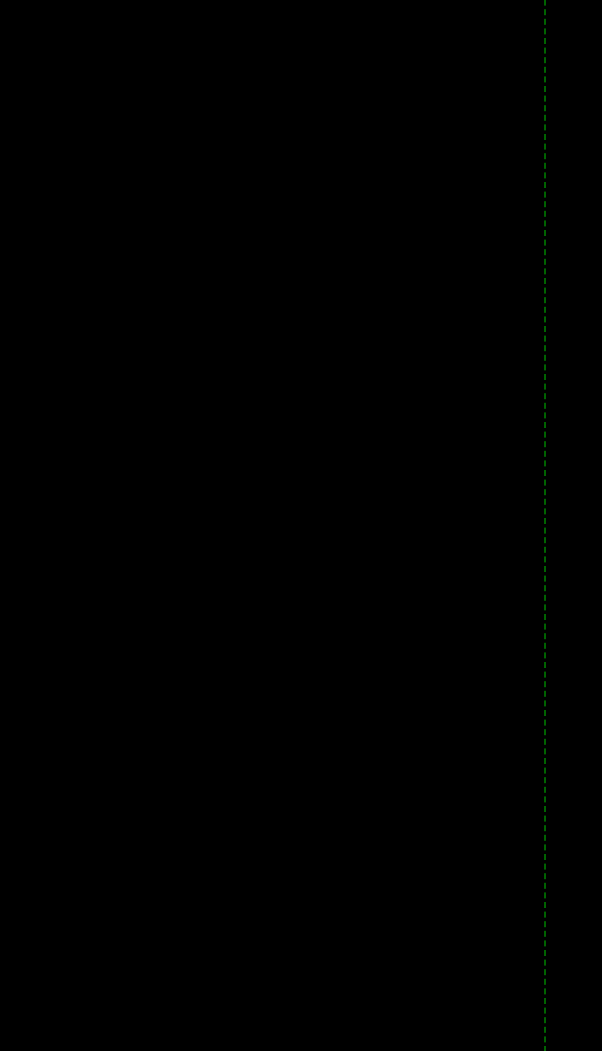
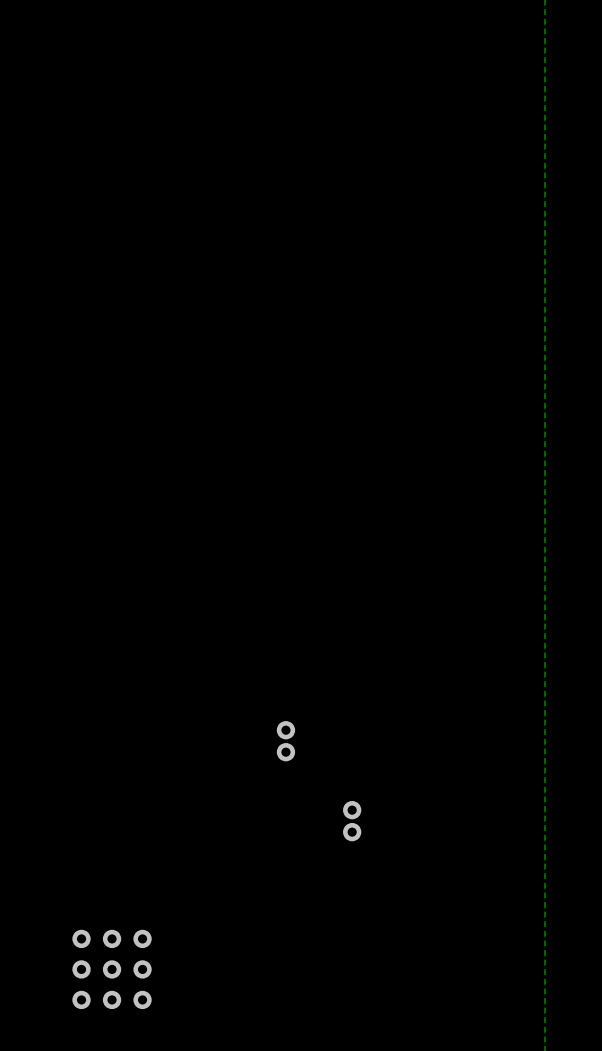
via: none -> (285, 730)
via: none -> (285, 752)
via: none -> (352, 810)
via: none -> (352, 832)
via: none -> (81, 938)
via: none -> (112, 938)
via: none -> (142, 938)
via: none -> (81, 969)
via: none -> (112, 969)
via: none -> (142, 969)
via: none -> (81, 999)
via: none -> (112, 999)
via: none -> (142, 999)

